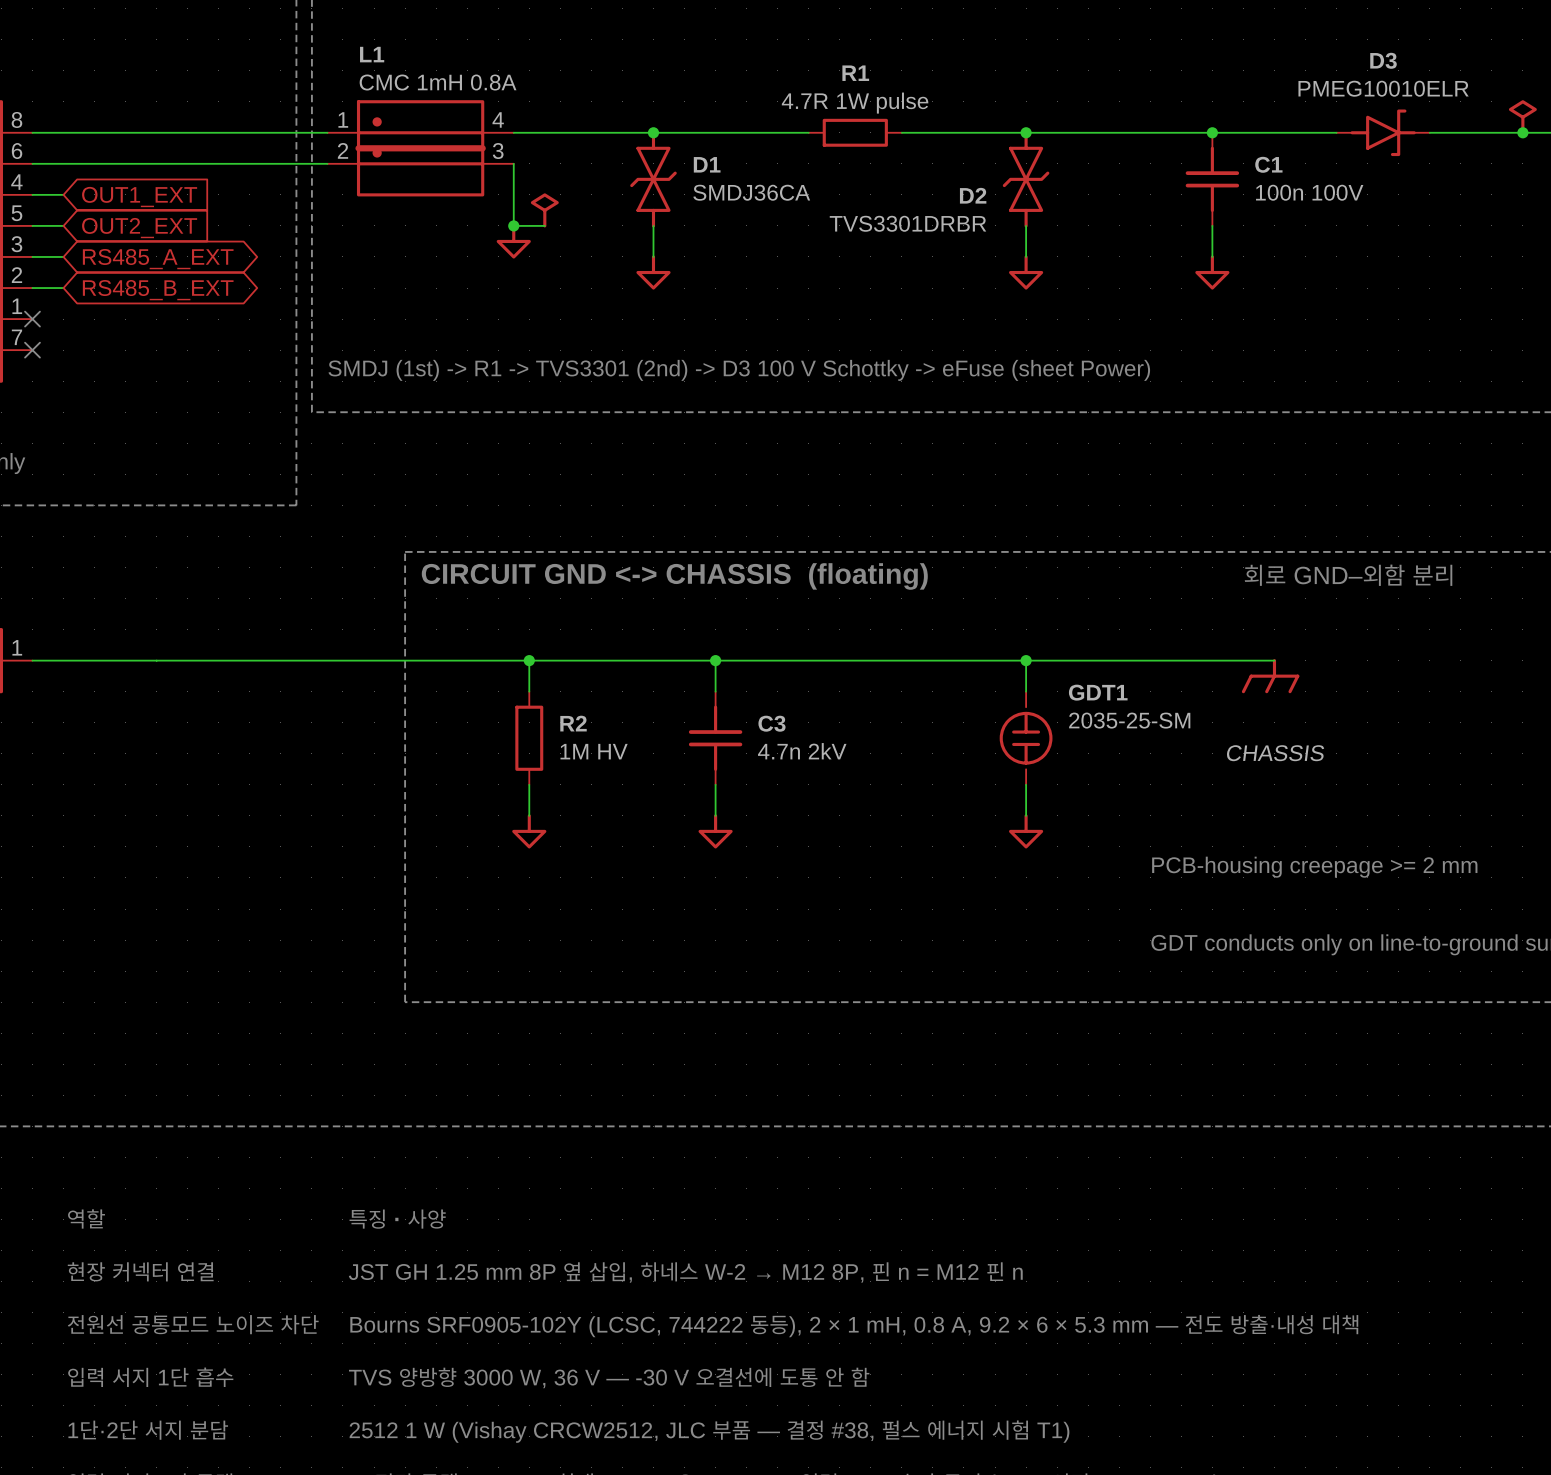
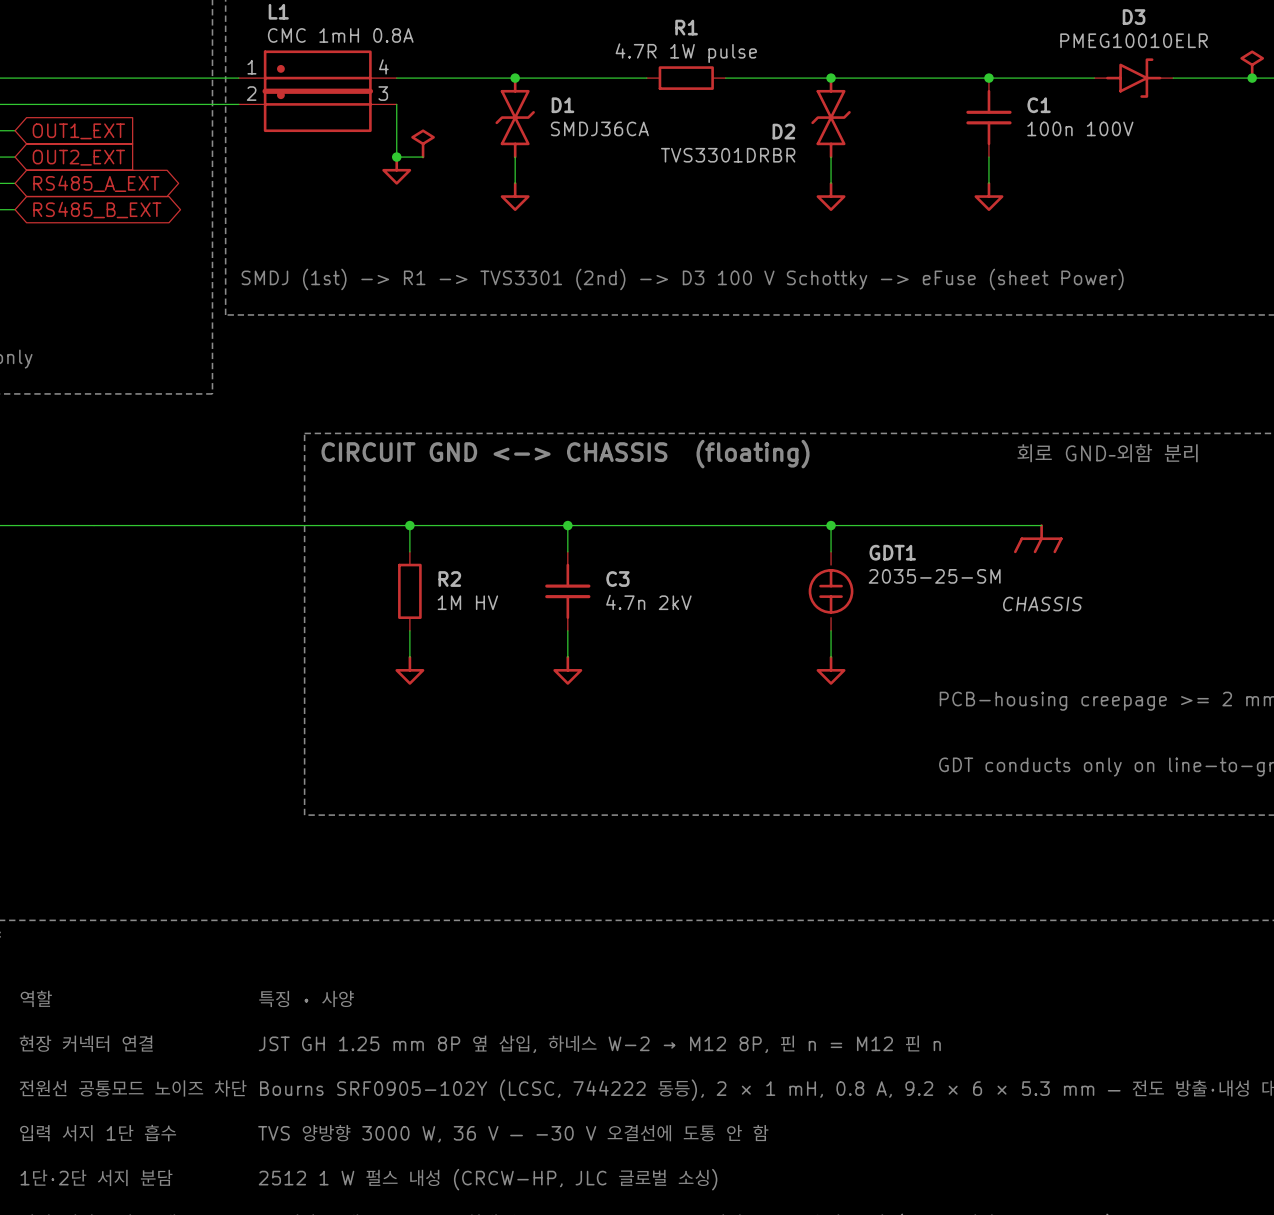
text: 2512 1 W (Vishay CRCW2512, JLC 부품 — 결정 #38, 펄스 에너지 시험 T1) (709, 1431) -> 2512 1 W 펄스 내성 (CRCW-HP, JLC 글로벌 소싱) (488, 1179)

